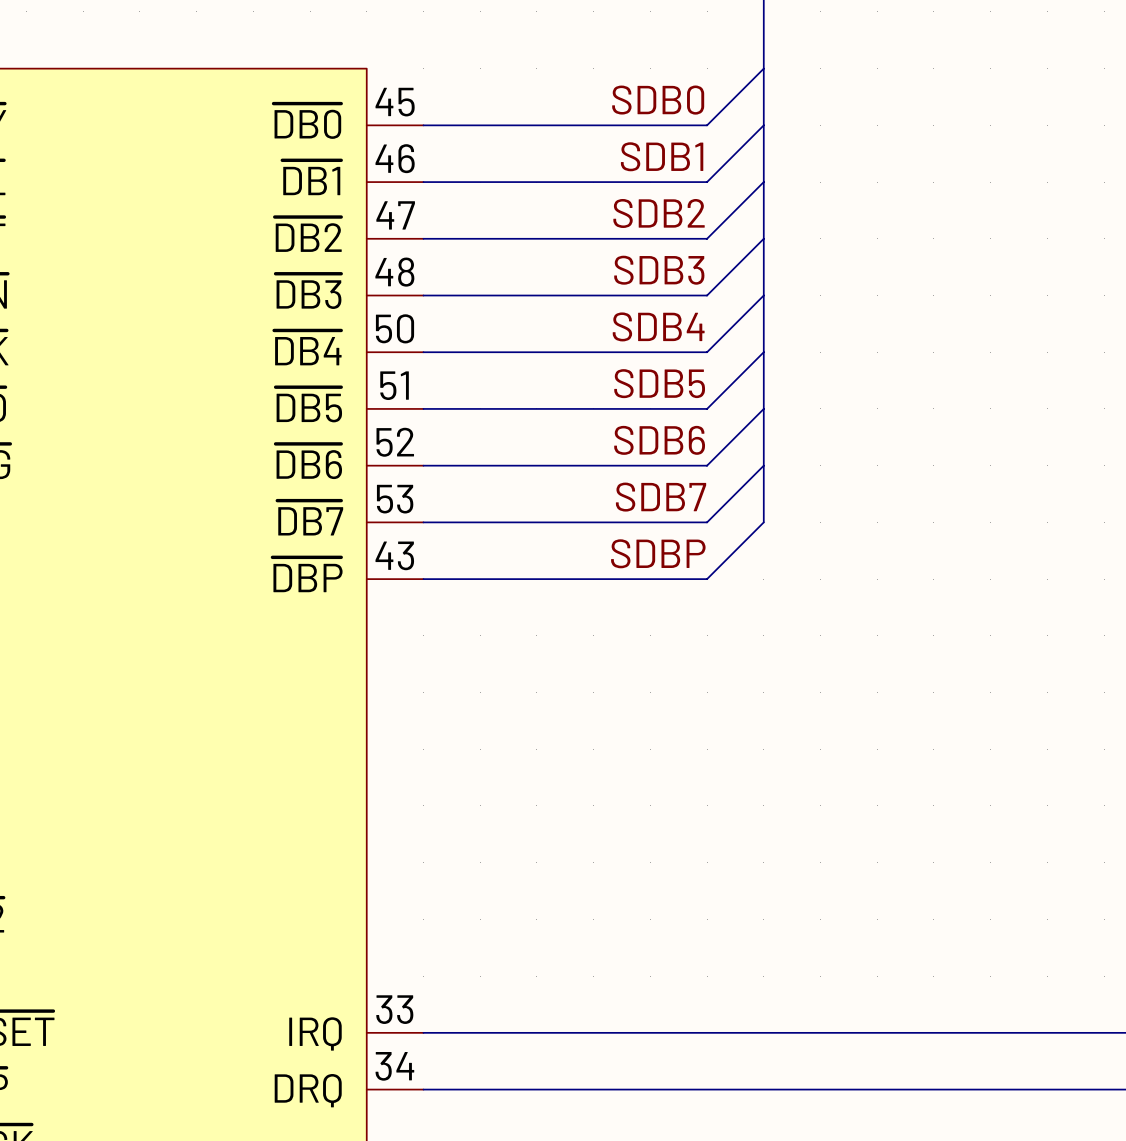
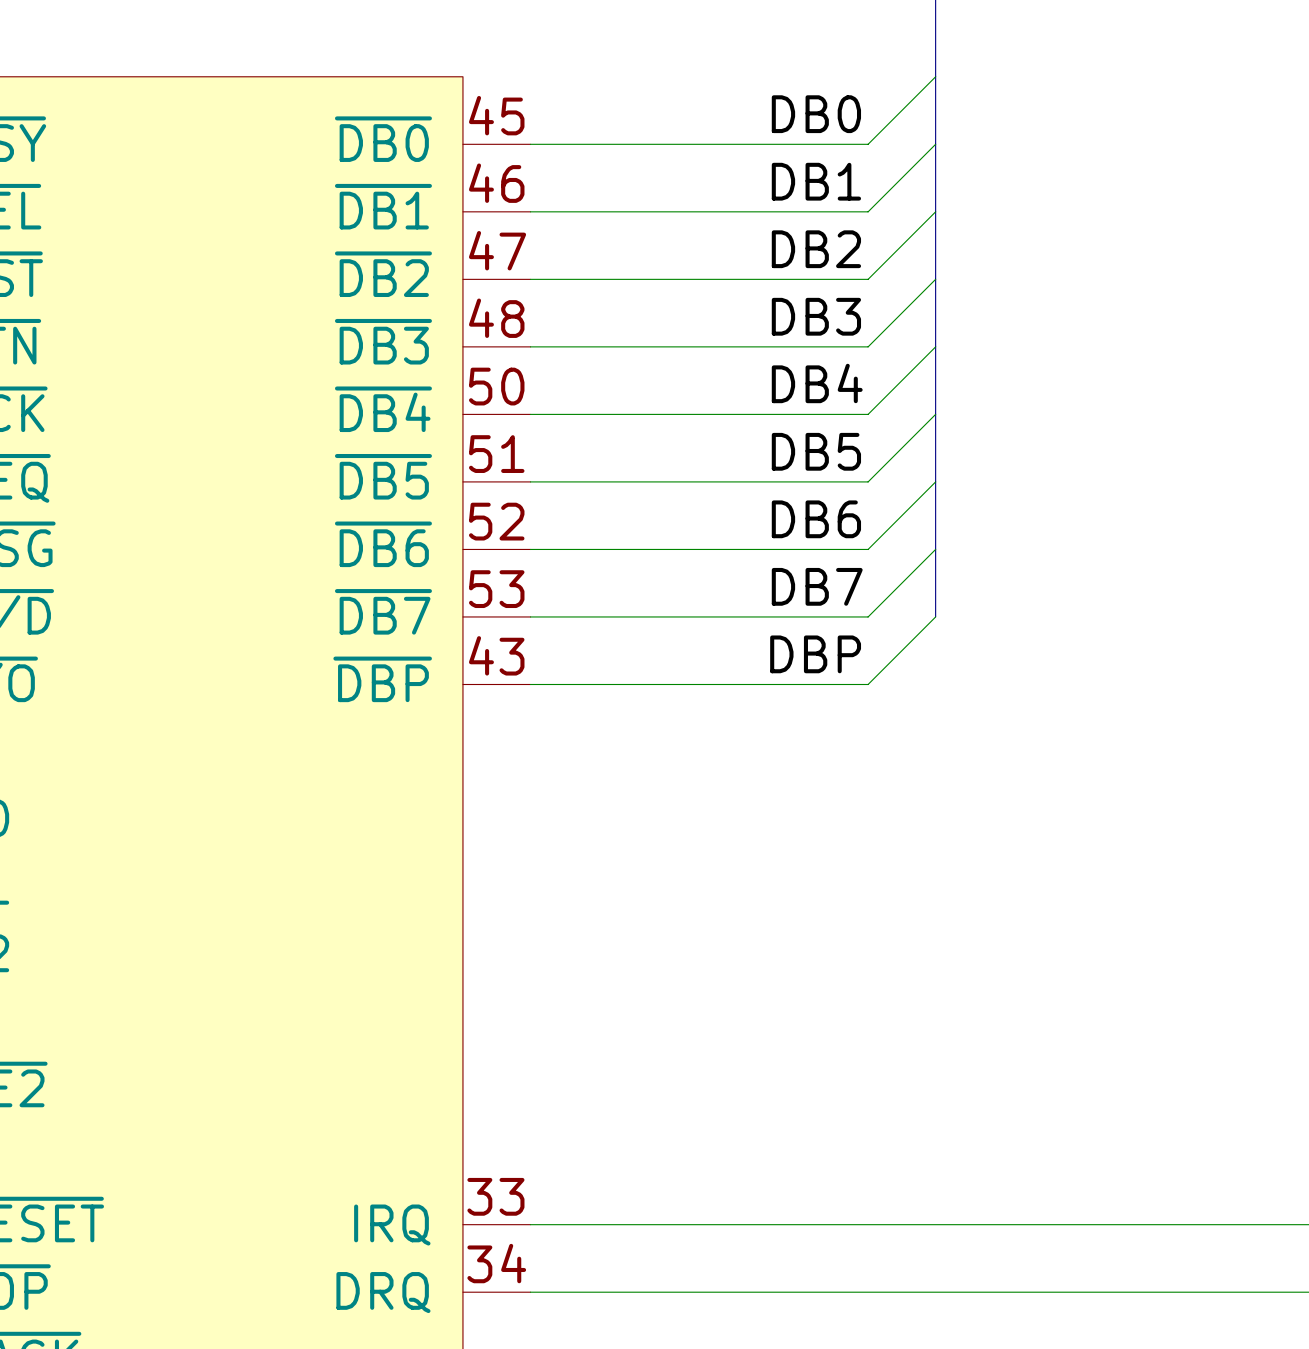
label: SDB0 (658, 100) -> DB0 (816, 114)
label: SDB1 (662, 156) -> DB1 (816, 181)
label: SDB2 (659, 213) -> DB2 (816, 249)
label: SDB3 (659, 270) -> DB3 (816, 316)
label: SDB4 (658, 326) -> DB4 (817, 383)
label: SDB5 (659, 383) -> DB5 (816, 451)
label: SDB6 (659, 440) -> DB6 (816, 519)
label: SDB7 (661, 497) -> DB7 (817, 586)
label: SDBP (658, 553) -> DBP (815, 654)

